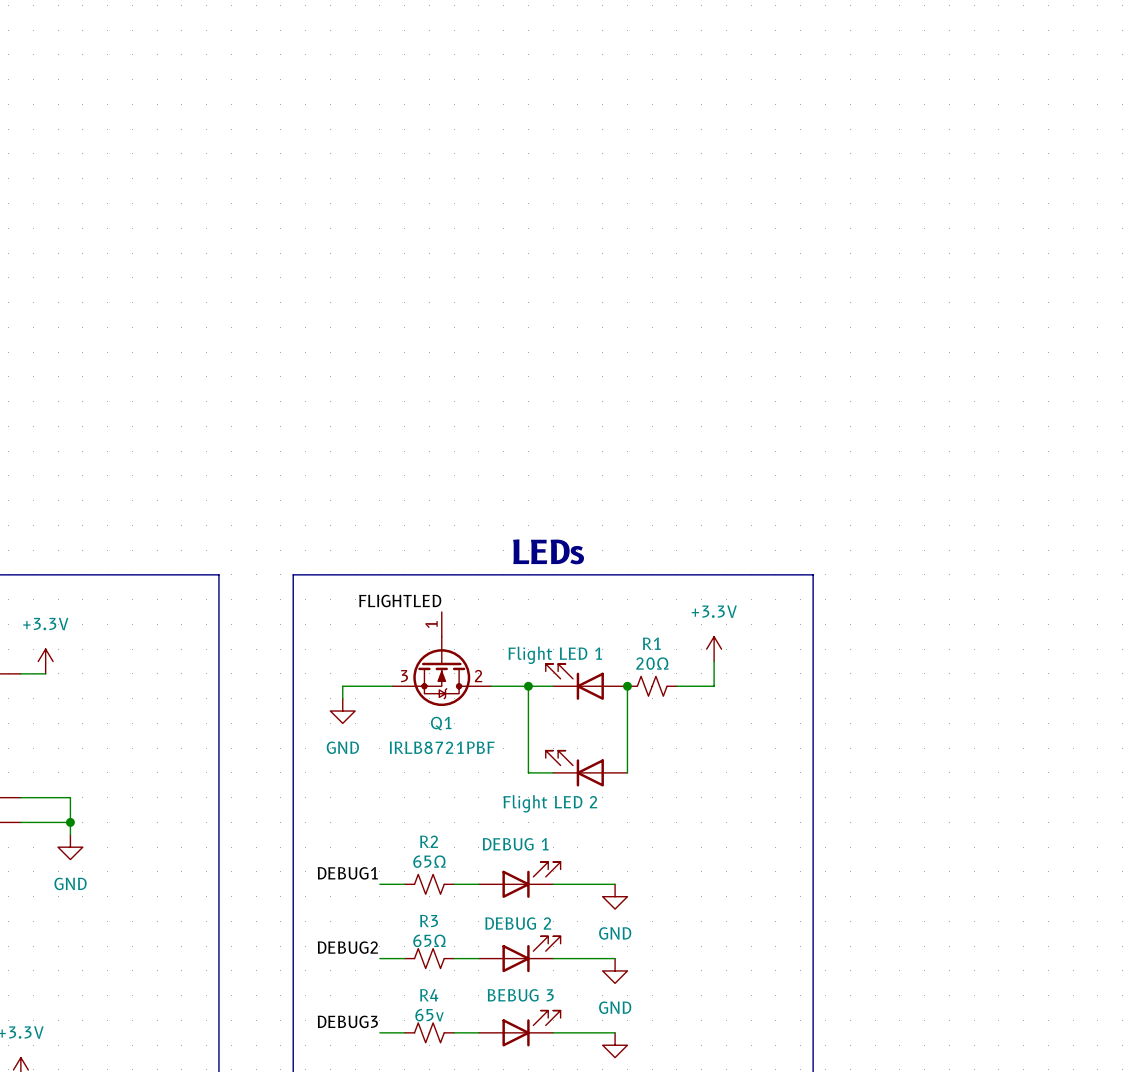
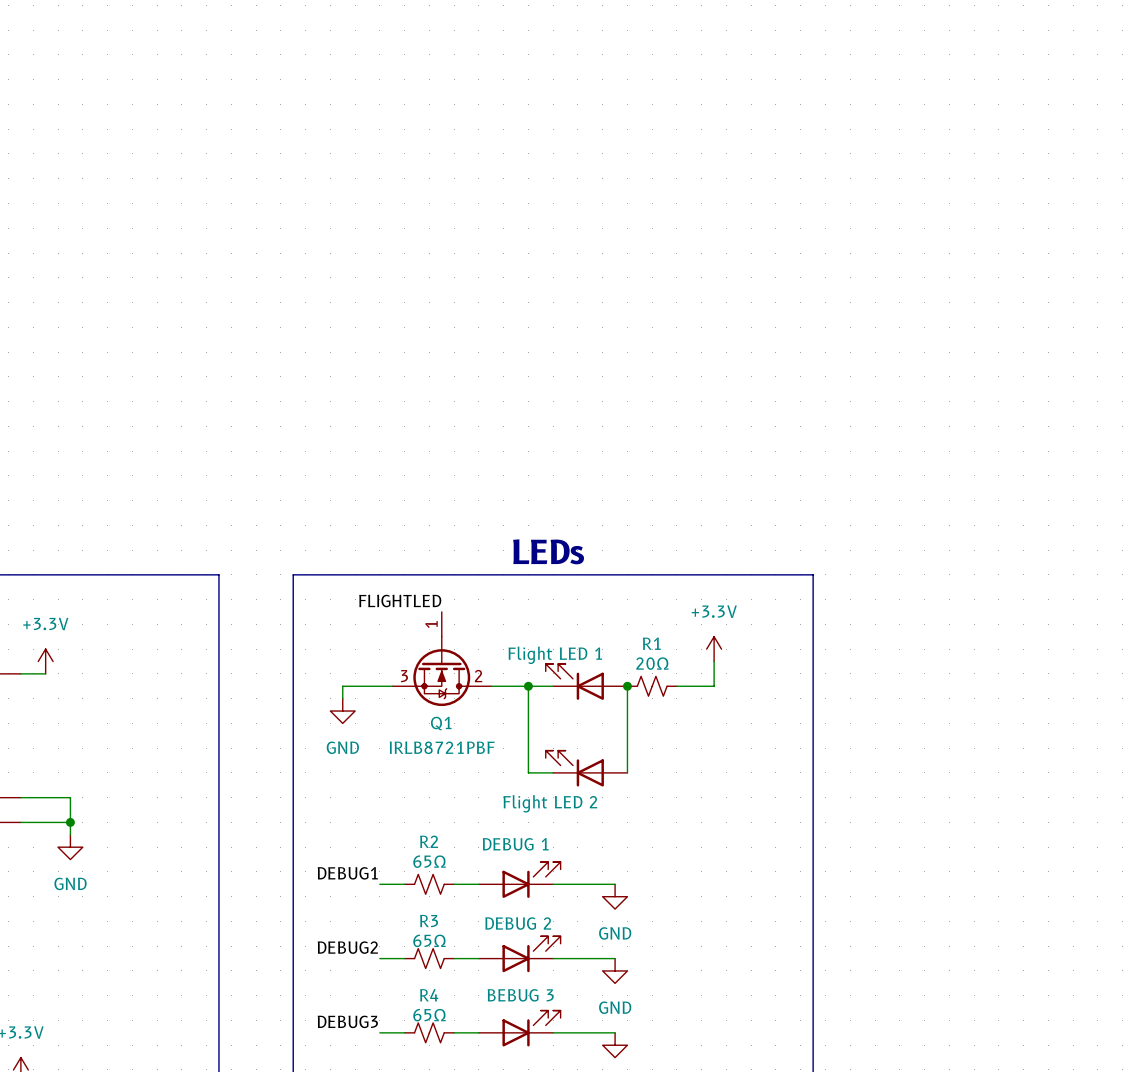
R4 value: 65v (429, 1015) -> 65Ω (429, 1015)

